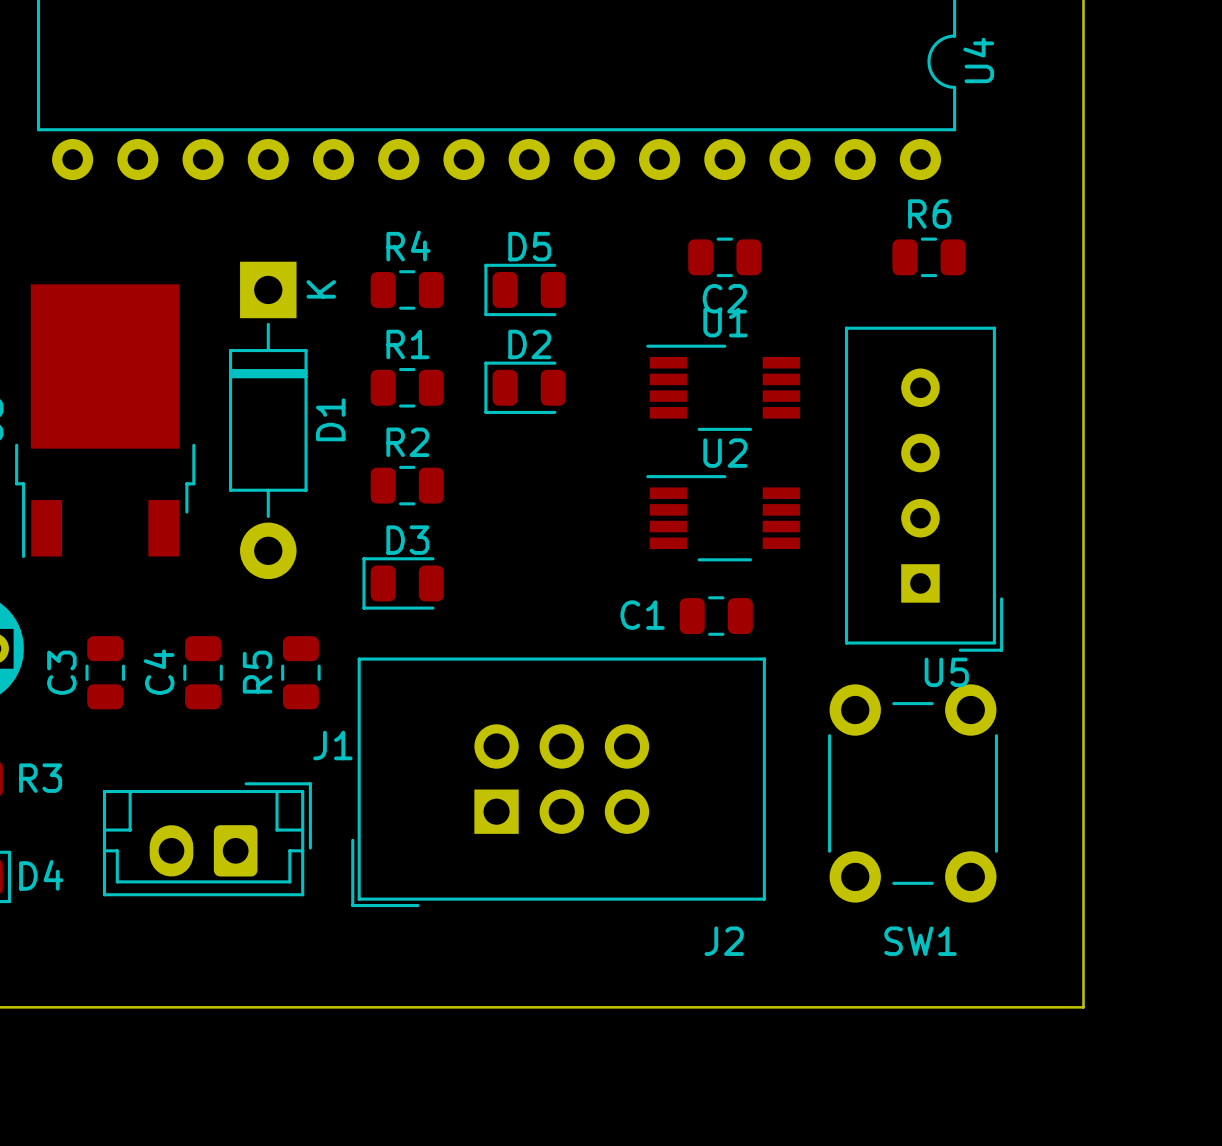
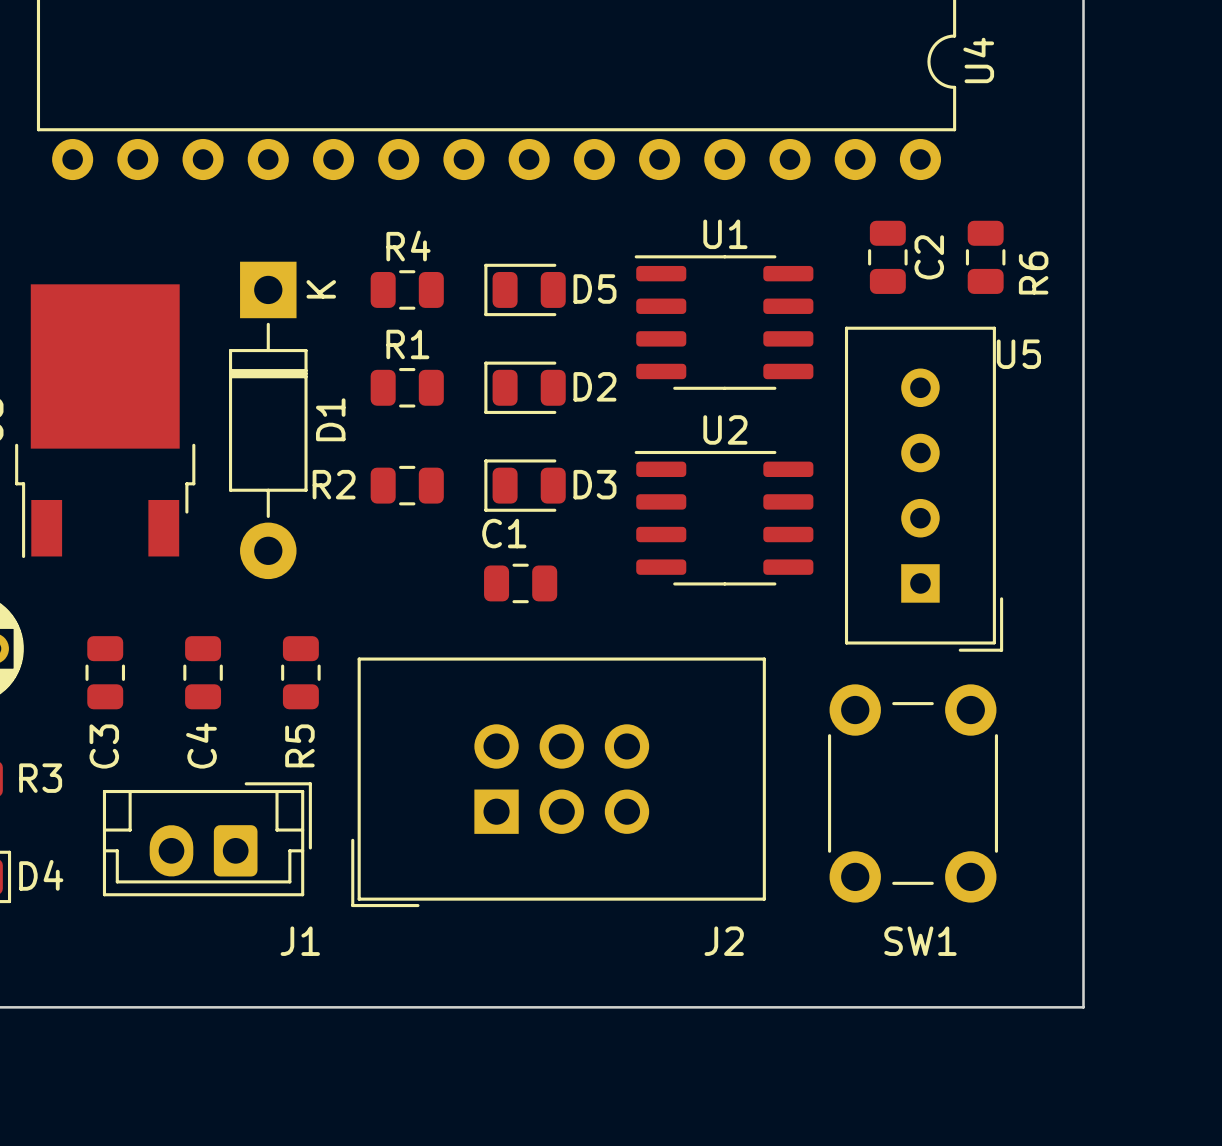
D5 name position: D5 (529, 246) -> D5 (594, 289)
C2 rotation: 0° (724, 257) -> 90° clockwise (887, 257)
C2 position: (724, 257) -> (887, 257)
R6 rotation: 0° (928, 257) -> 90° clockwise (985, 257)
R6 position: (928, 257) -> (985, 257)
C2 name position: C2 (724, 298) -> C2 (929, 257)
D2 name position: D2 (529, 344) -> D2 (594, 386)
U1 footprint: [646, 344, 800, 431] -> [634, 255, 814, 390]
R2 name position: R2 (407, 442) -> R2 (334, 484)
U2 footprint: [646, 475, 800, 562] -> [634, 450, 814, 586]
D3 name position: D3 (407, 540) -> D3 (594, 484)
D3 position: (403, 583) -> (525, 485)
C1 name position: C1 (642, 615) -> C1 (504, 533)
C1 position: (716, 616) -> (520, 583)
C3 name position: C3 (61, 672) -> C3 (104, 746)
C4 name position: C4 (159, 672) -> C4 (201, 745)
R5 name position: R5 (257, 672) -> R5 (299, 745)
U5 name position: U5 (946, 672) -> U5 (1018, 354)
J1 name position: J1 (332, 745) -> J1 (300, 941)

